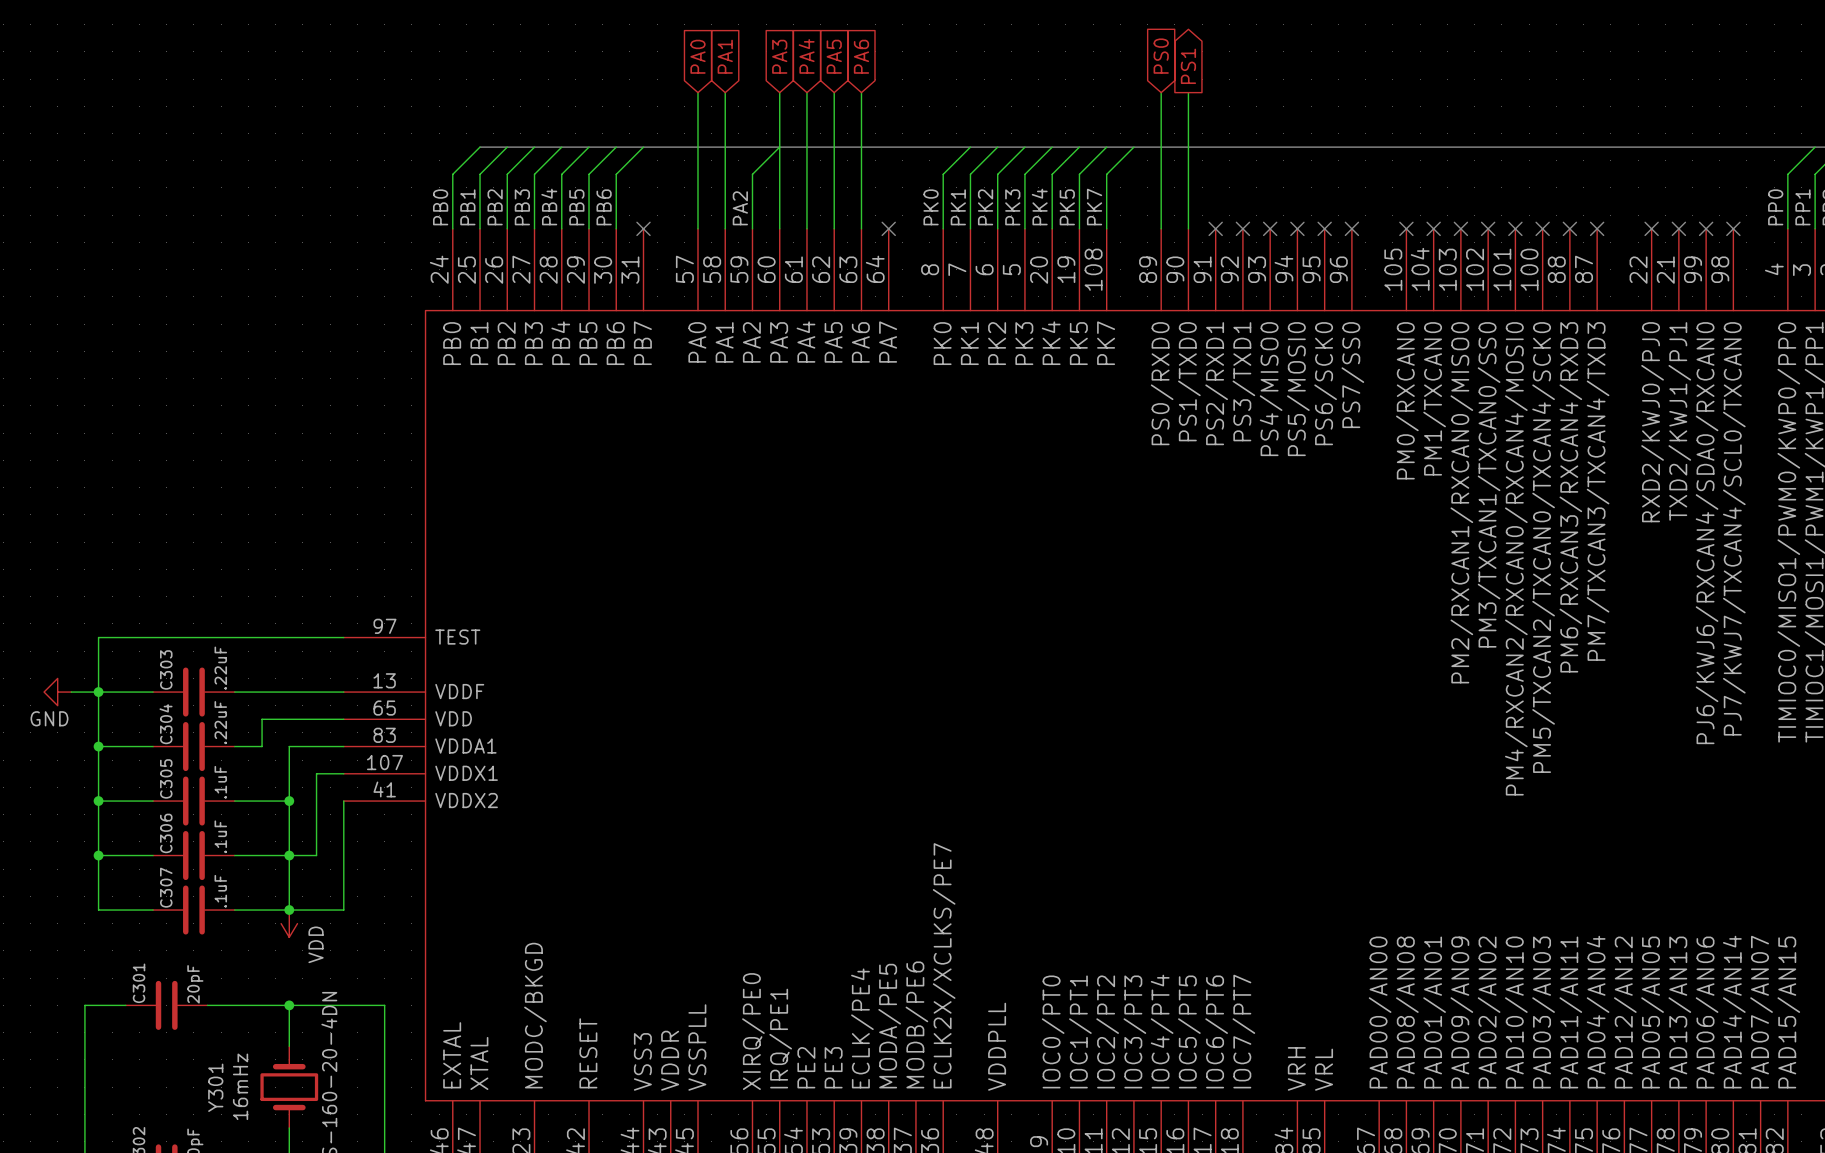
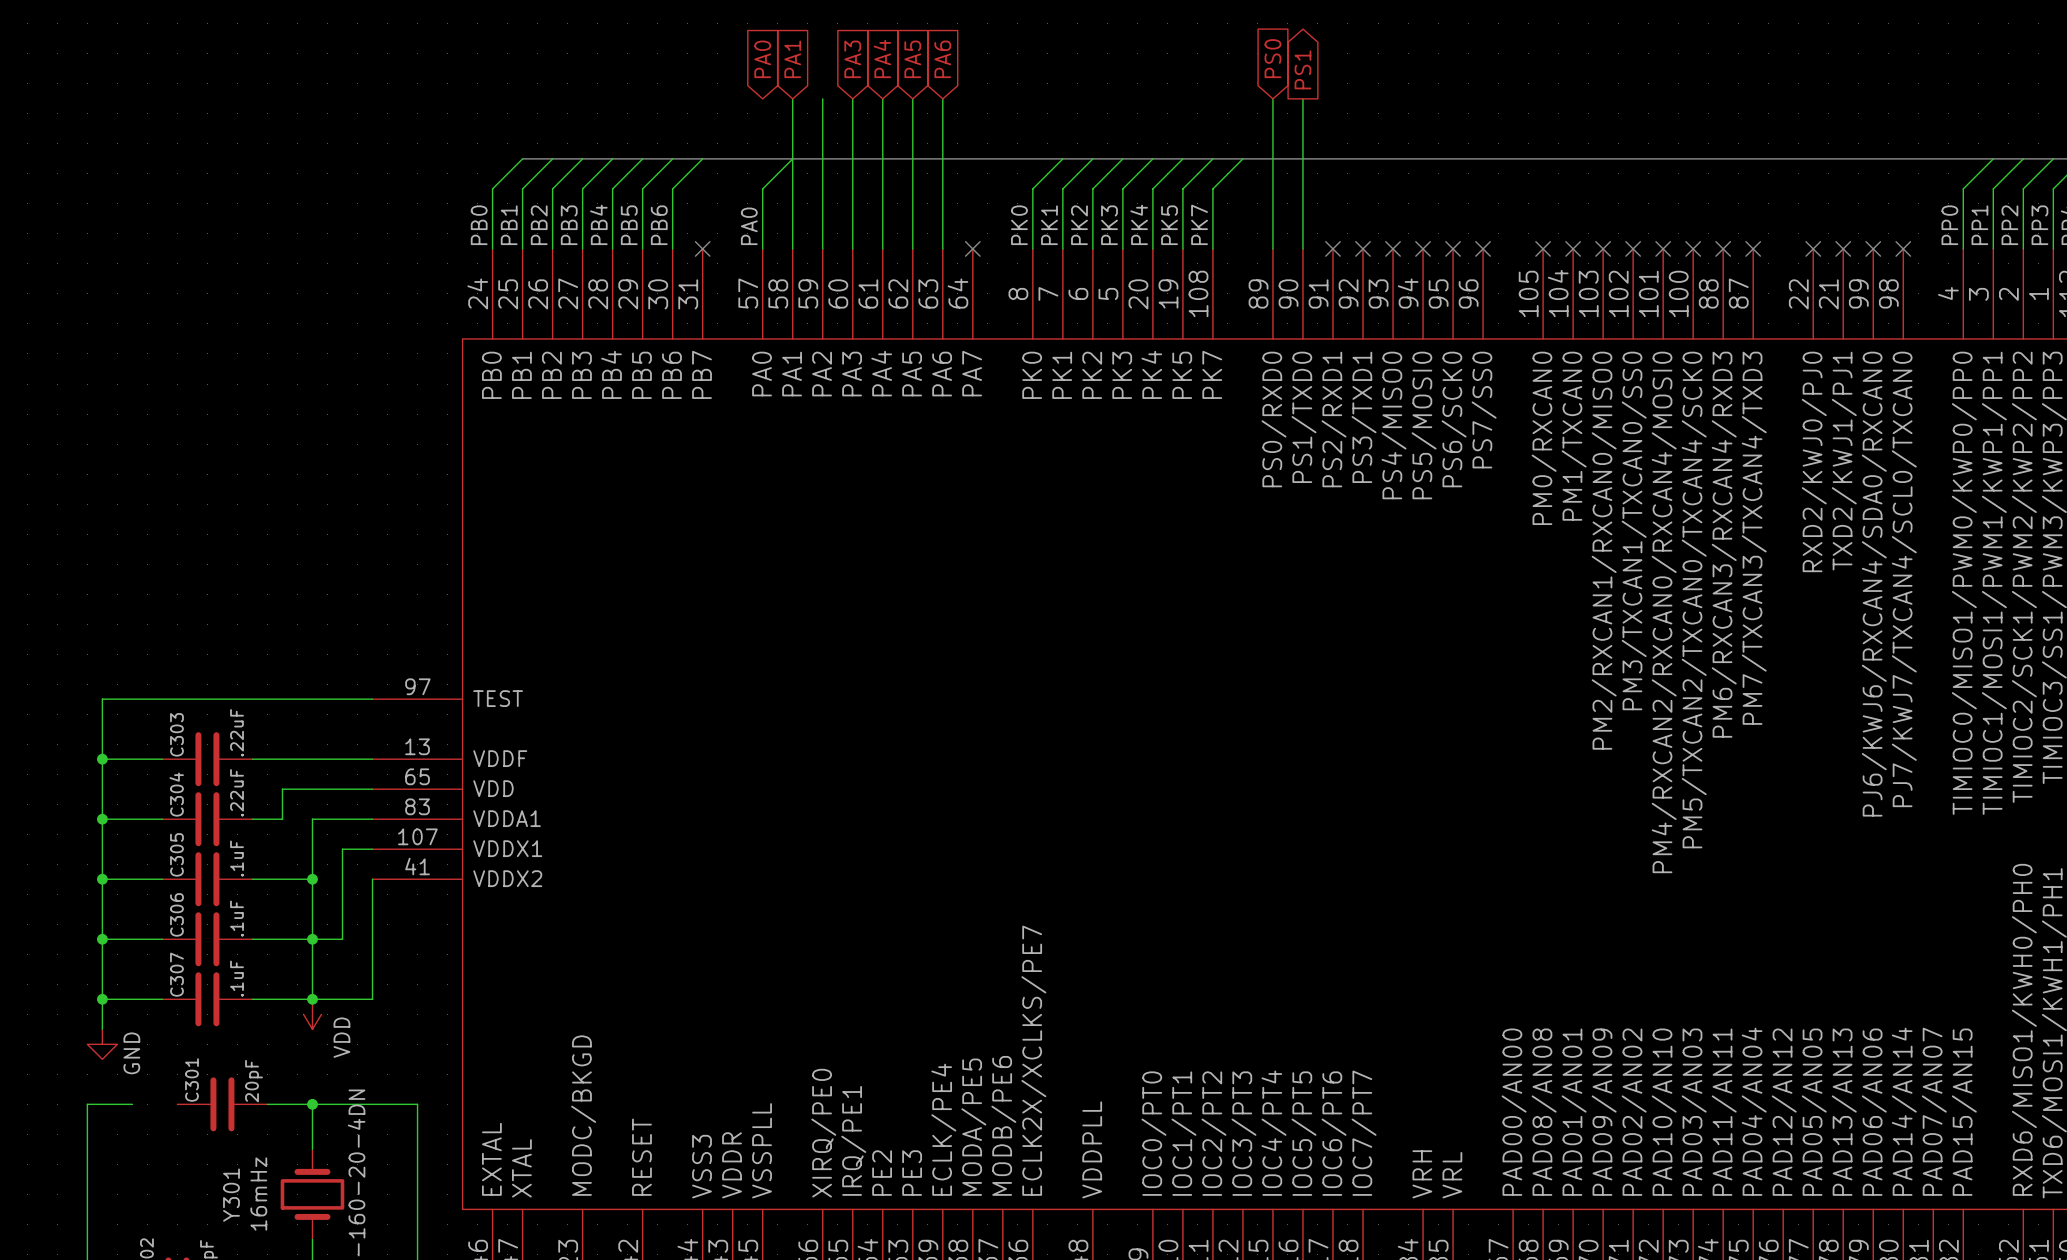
wire: (697, 92) (697, 174) -> (792, 158) (762, 188)
wire: (779, 147) (752, 174) -> (822, 98) (822, 188)
label: none -> PA0 (749, 226)
label: PA2 (740, 208) -> none
power symbol: GND (57, 692) -> none
wire: (71, 692) (98, 692) -> none
wire: none -> (102, 999) (102, 1029)
junction: none -> (102, 999)
power symbol: none -> GND (102, 1044)
C301 position: (166, 1005) -> (222, 1104)

